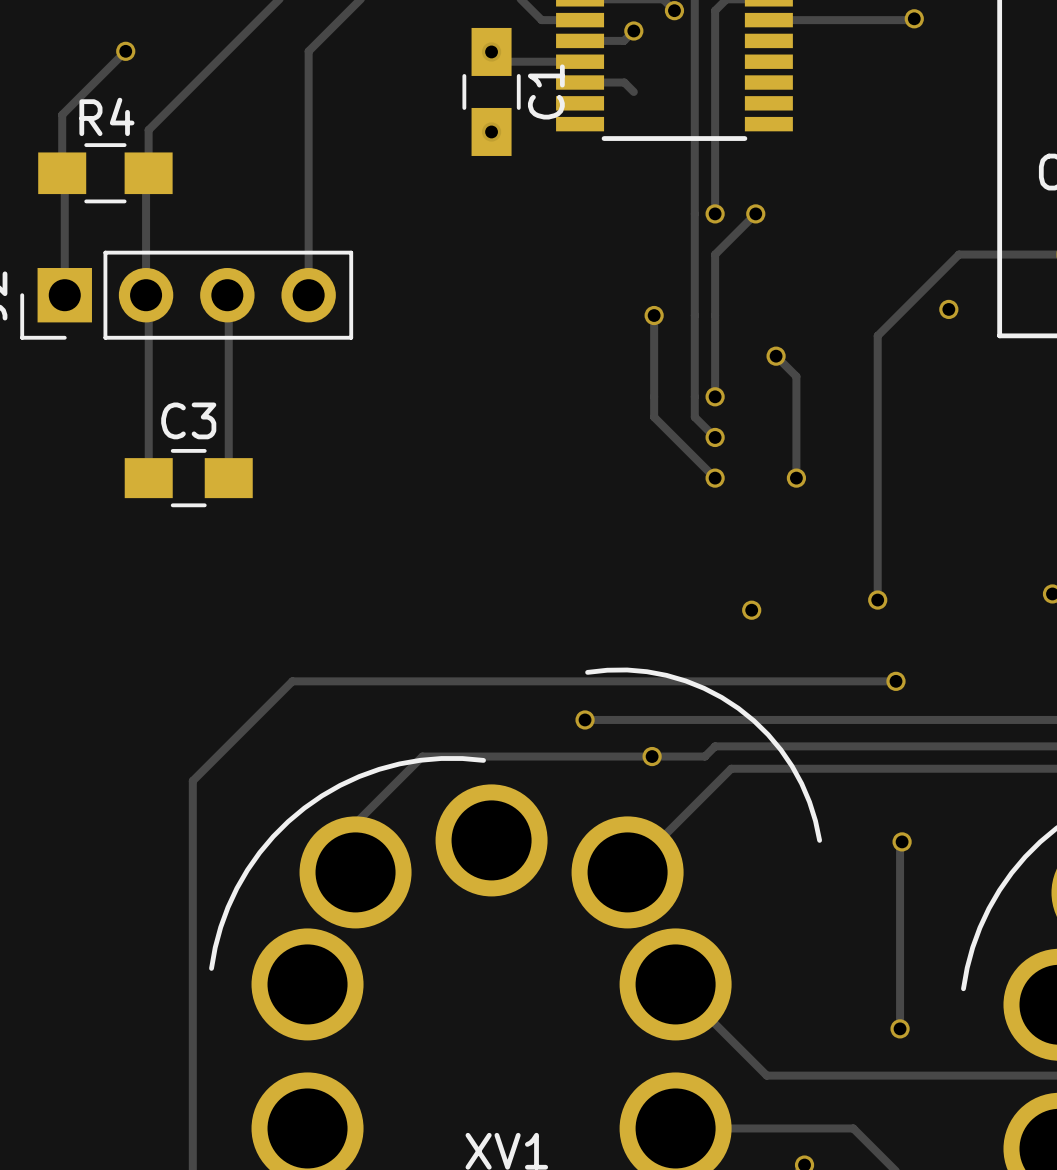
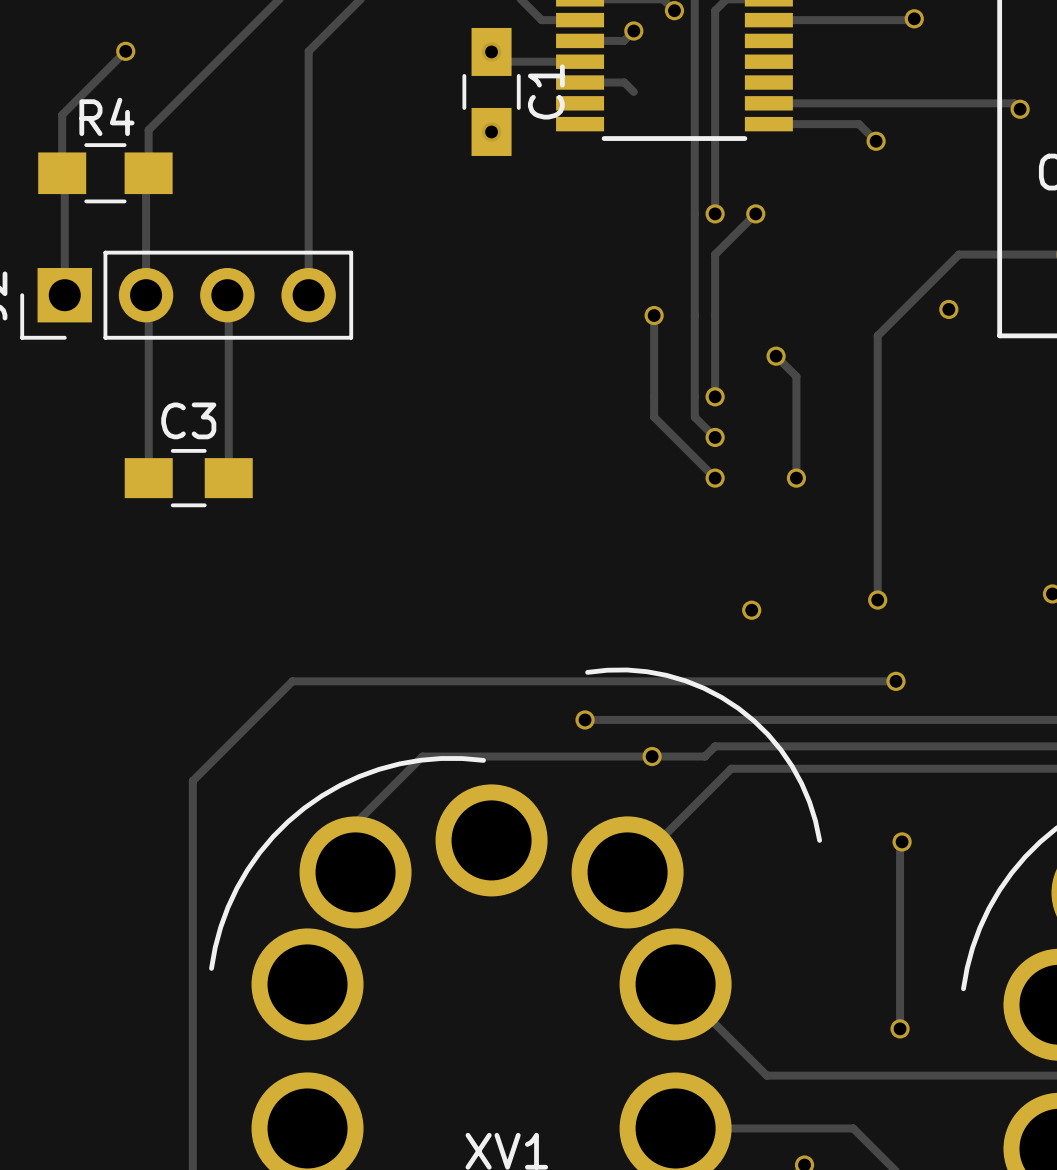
track: none -> (768, 103) (1014, 103) (1020, 109)
via: none -> (1020, 109)
track: none -> (768, 124) (858, 124) (876, 141)
via: none -> (876, 141)

